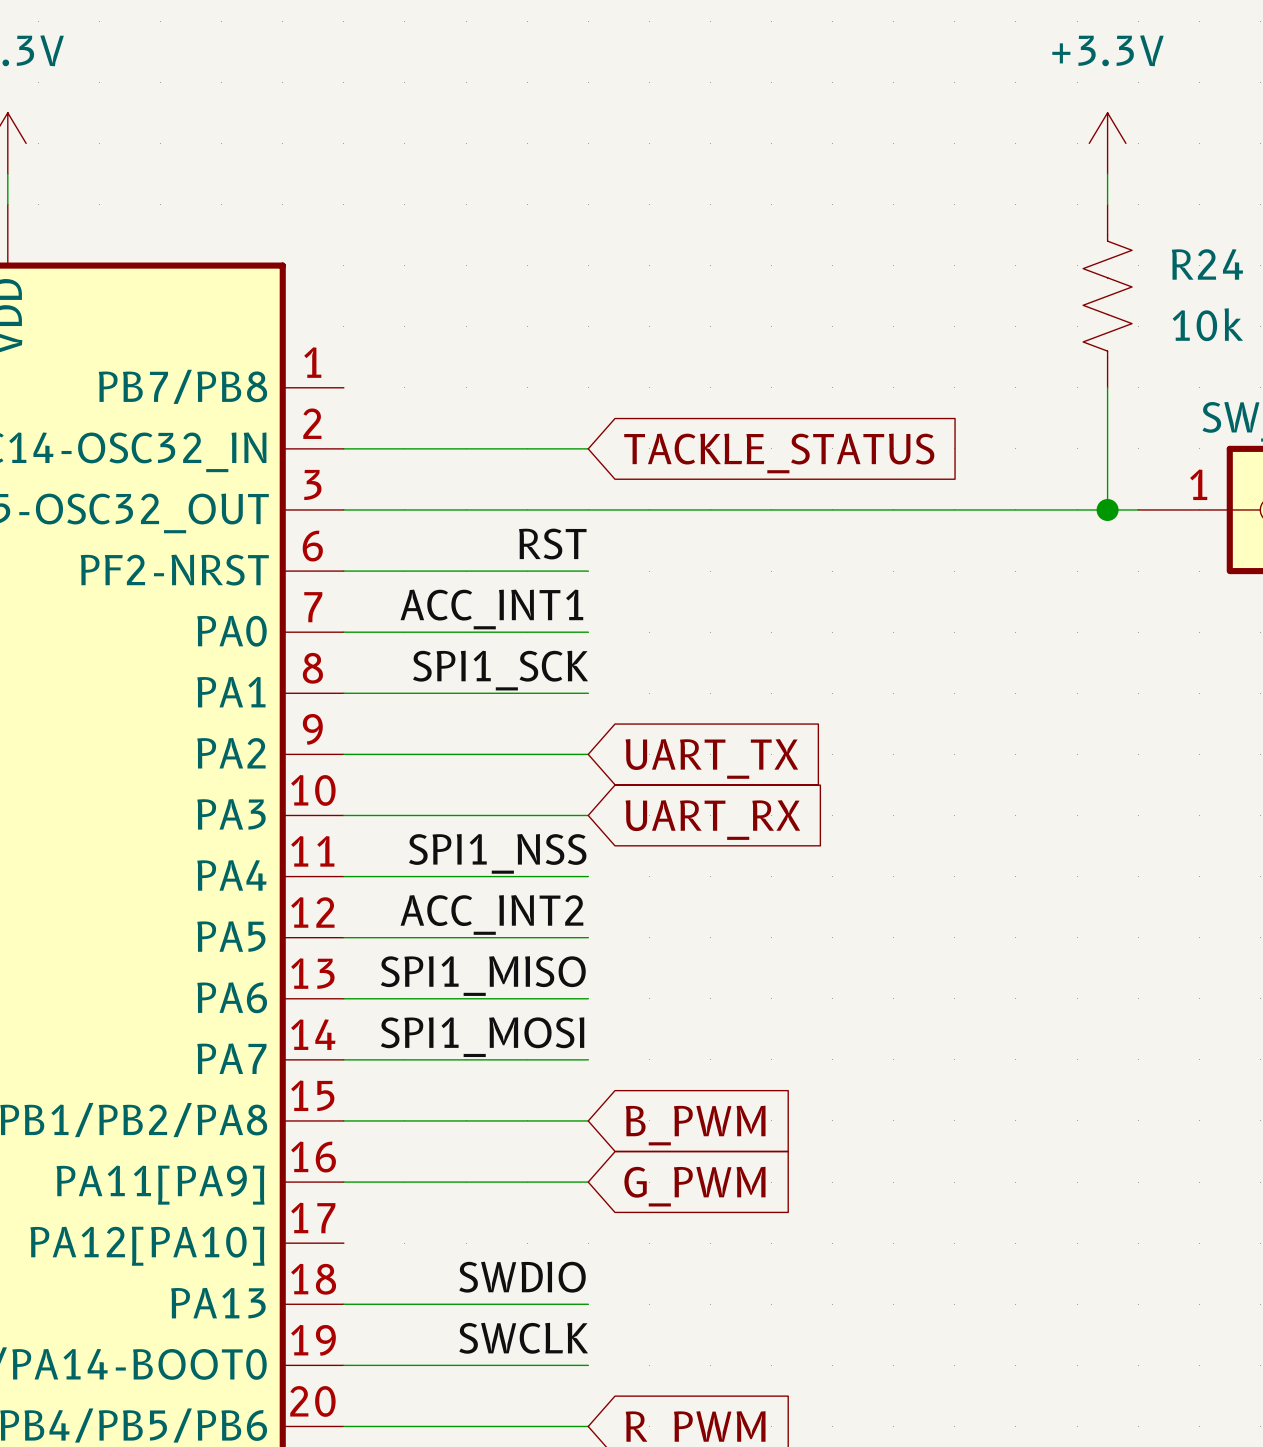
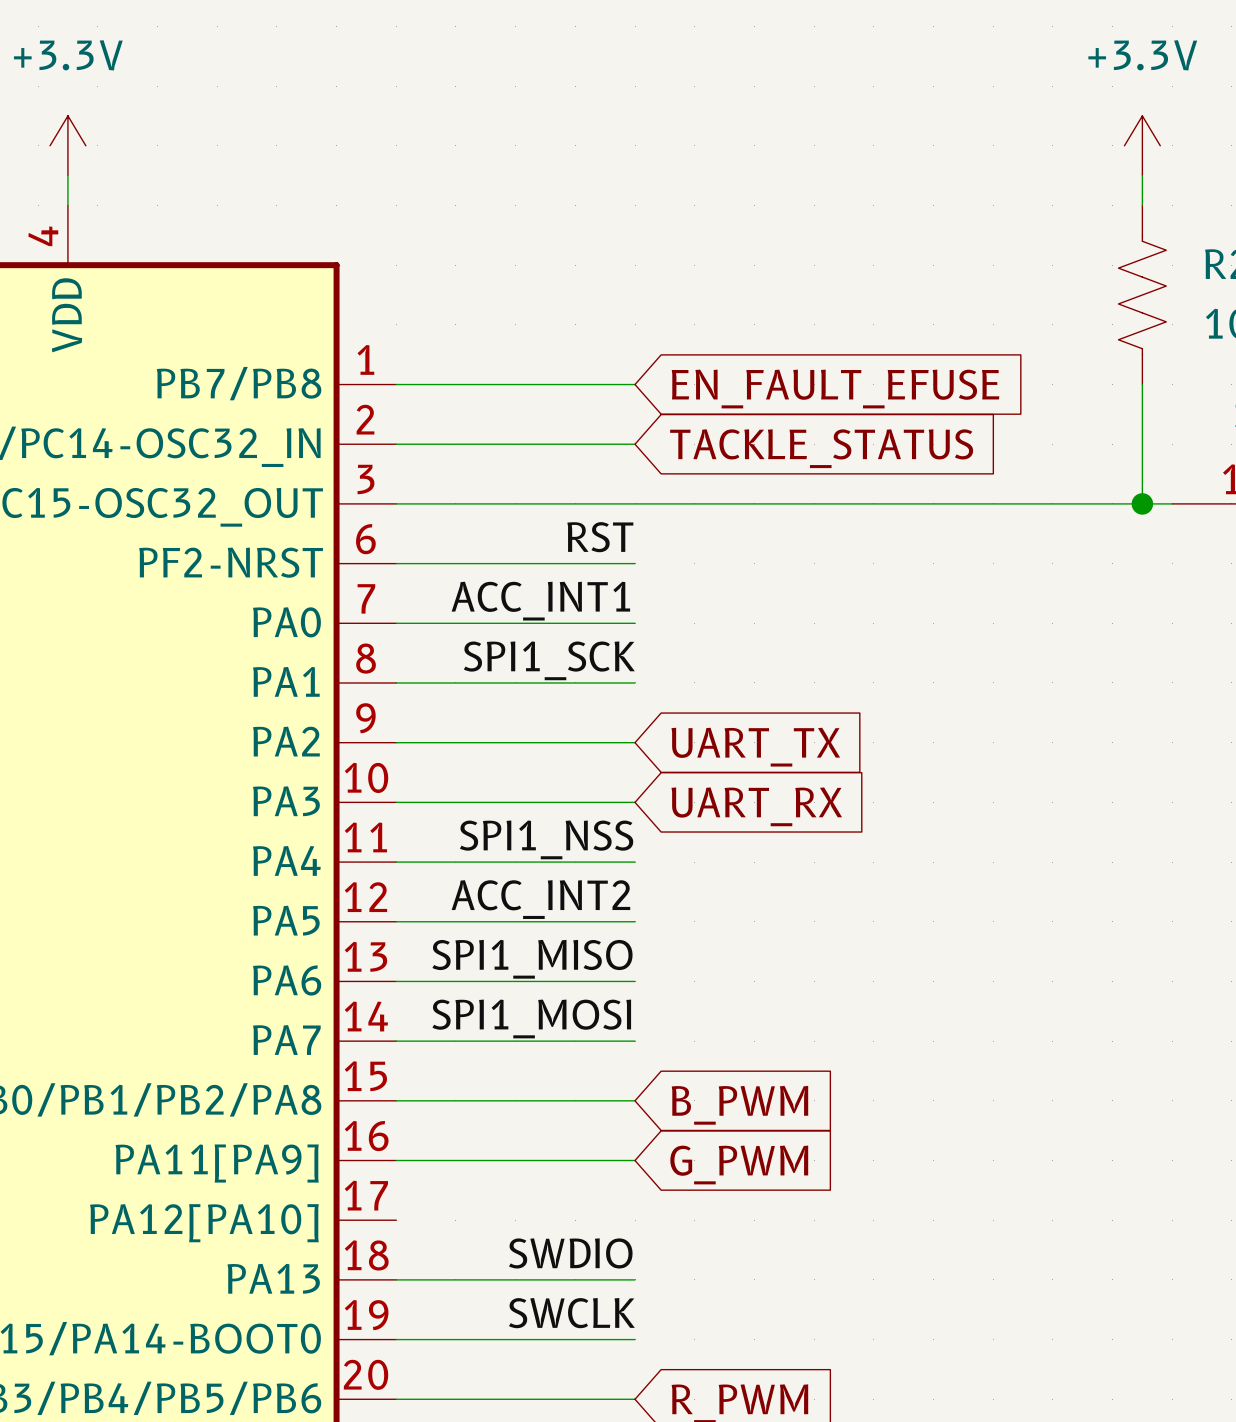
wire: none -> (396, 384) (635, 384)
global label: none -> EN_FAULT_EFUSE (835, 389)

